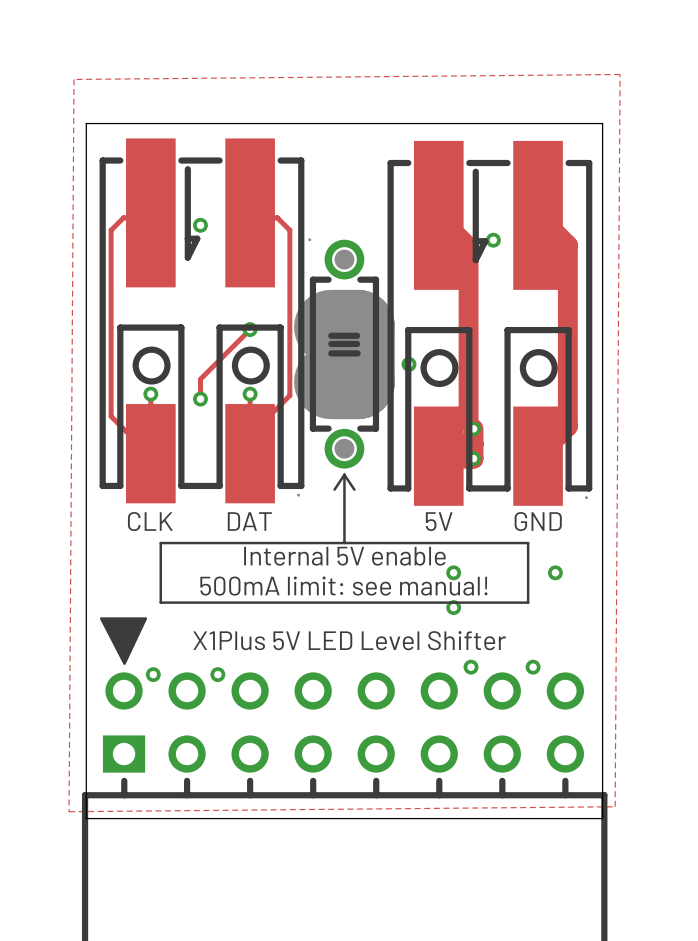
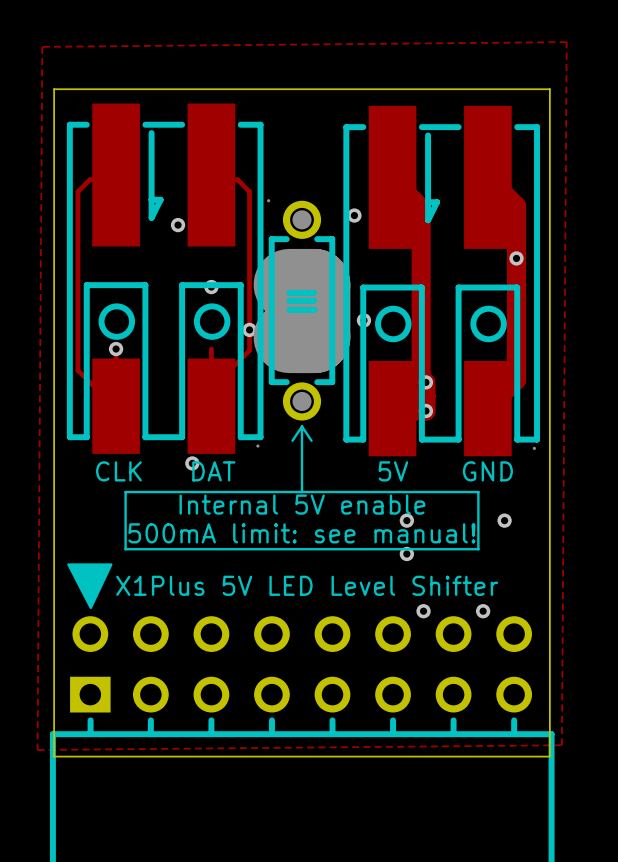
via position: (200, 225) -> (178, 225)
via: (493, 240) -> none
via: none -> (354, 215)
via: none -> (516, 258)
track: (250, 329) (200, 379) (200, 399) -> none
via position: (250, 394) -> (249, 329)
via: (200, 399) -> none
via: none -> (192, 463)
via: (153, 674) -> none
via: (217, 674) -> none

